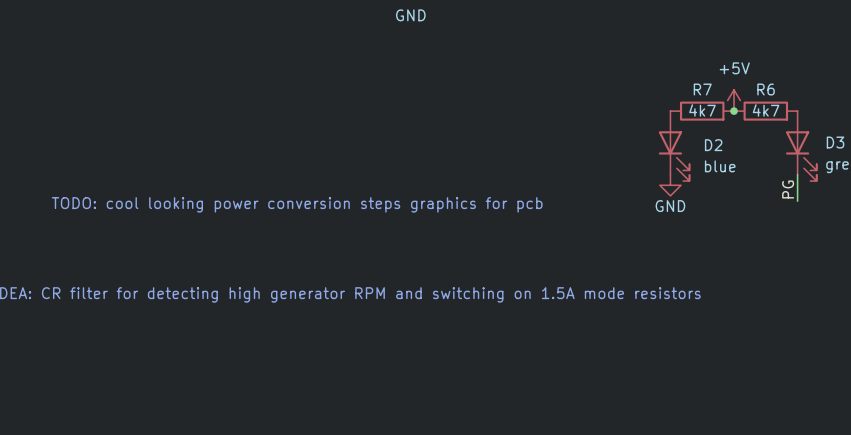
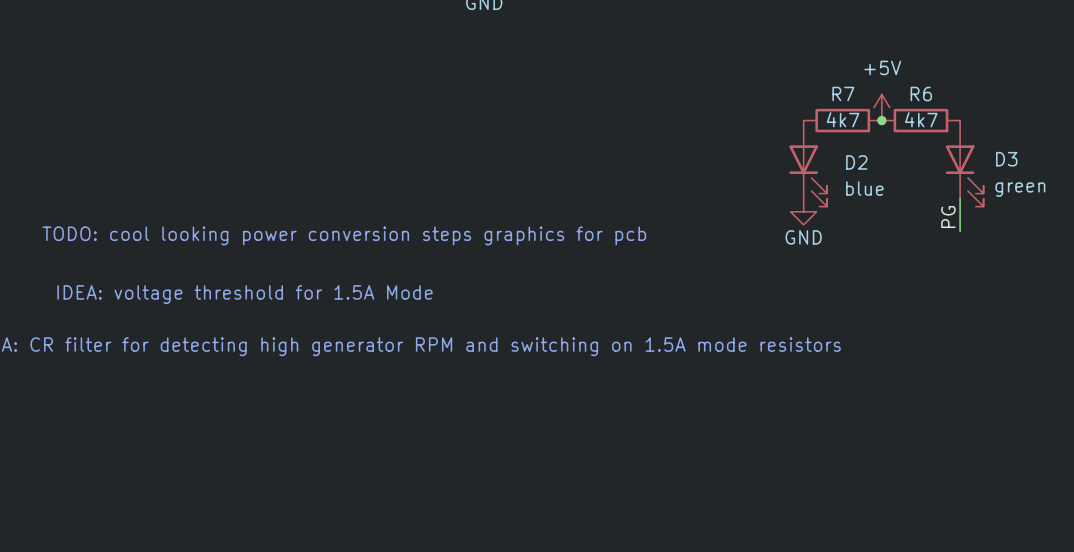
text: none -> IDEA: voltage threshold for 1.5A Mode (245, 294)

